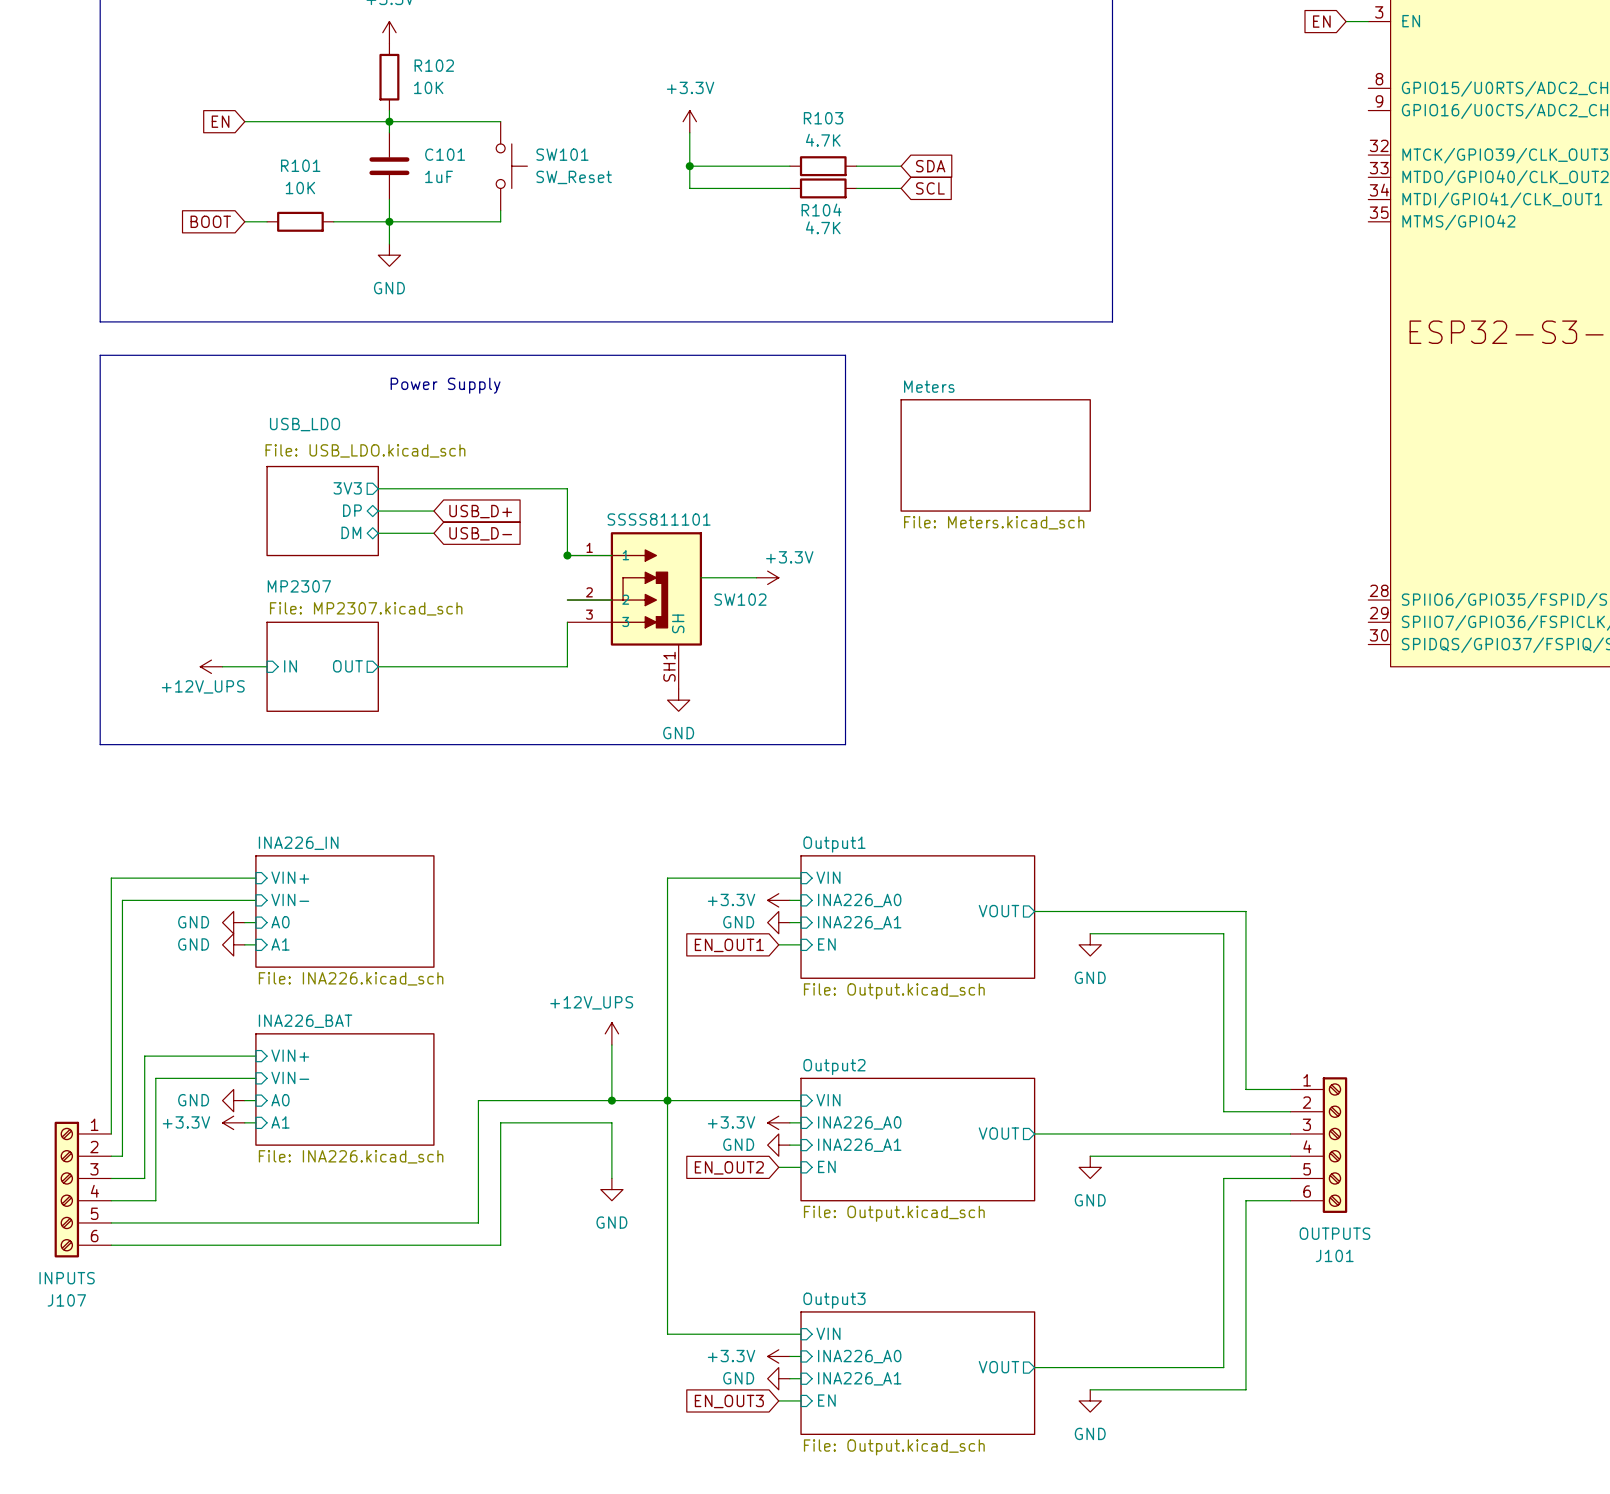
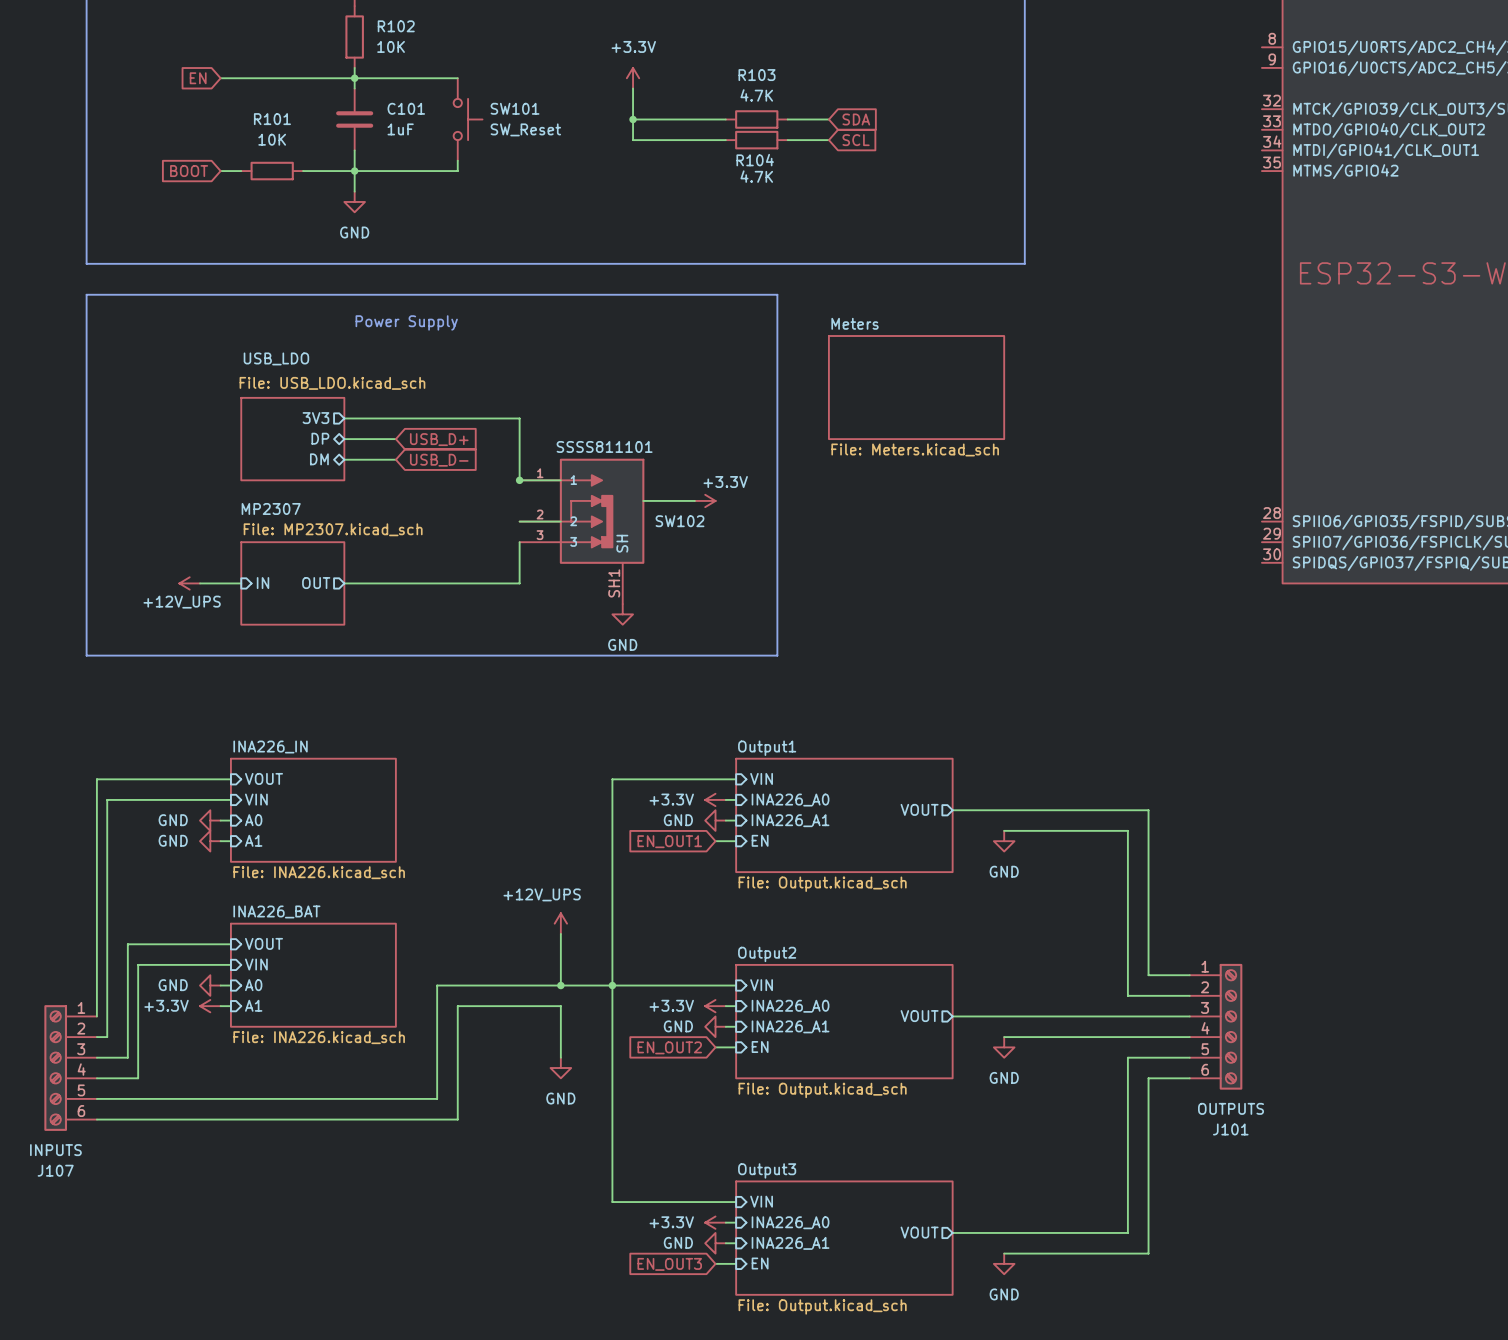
sheet pin: VIN+ (290, 877) -> VOUT (264, 778)
sheet pin: VIN- (290, 899) -> VIN (256, 799)
sheet pin: VIN+ (290, 1055) -> VOUT (264, 943)
sheet pin: VIN- (290, 1077) -> VIN (256, 964)

